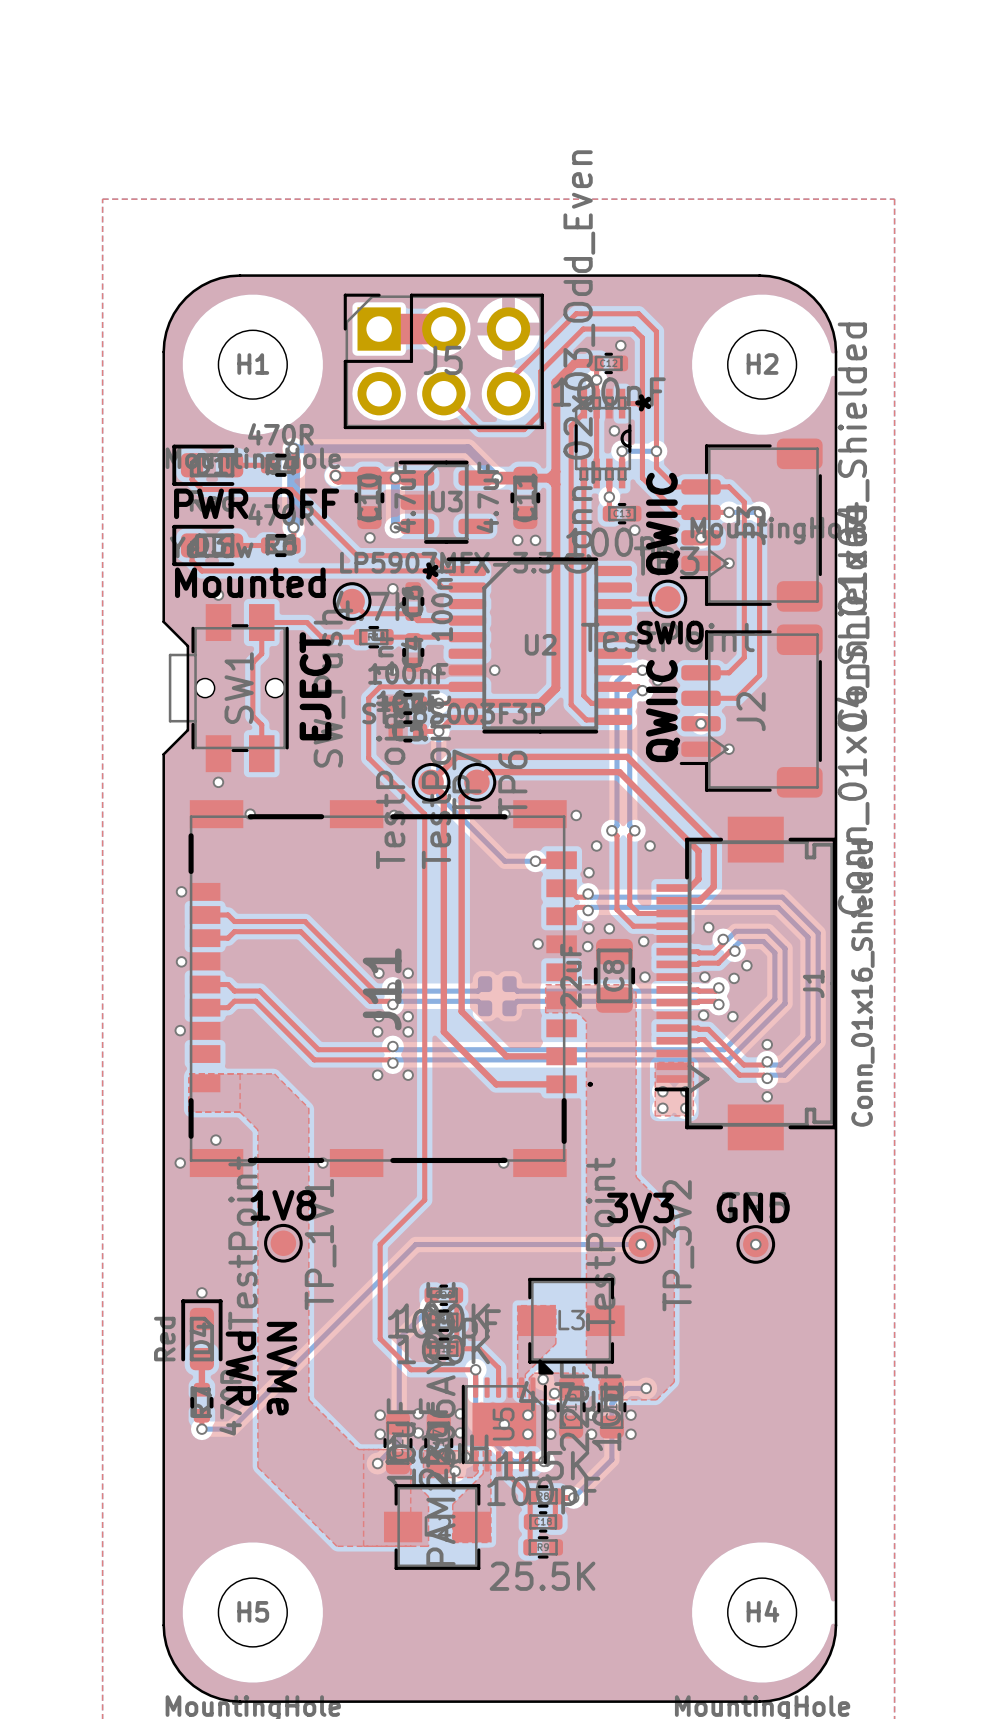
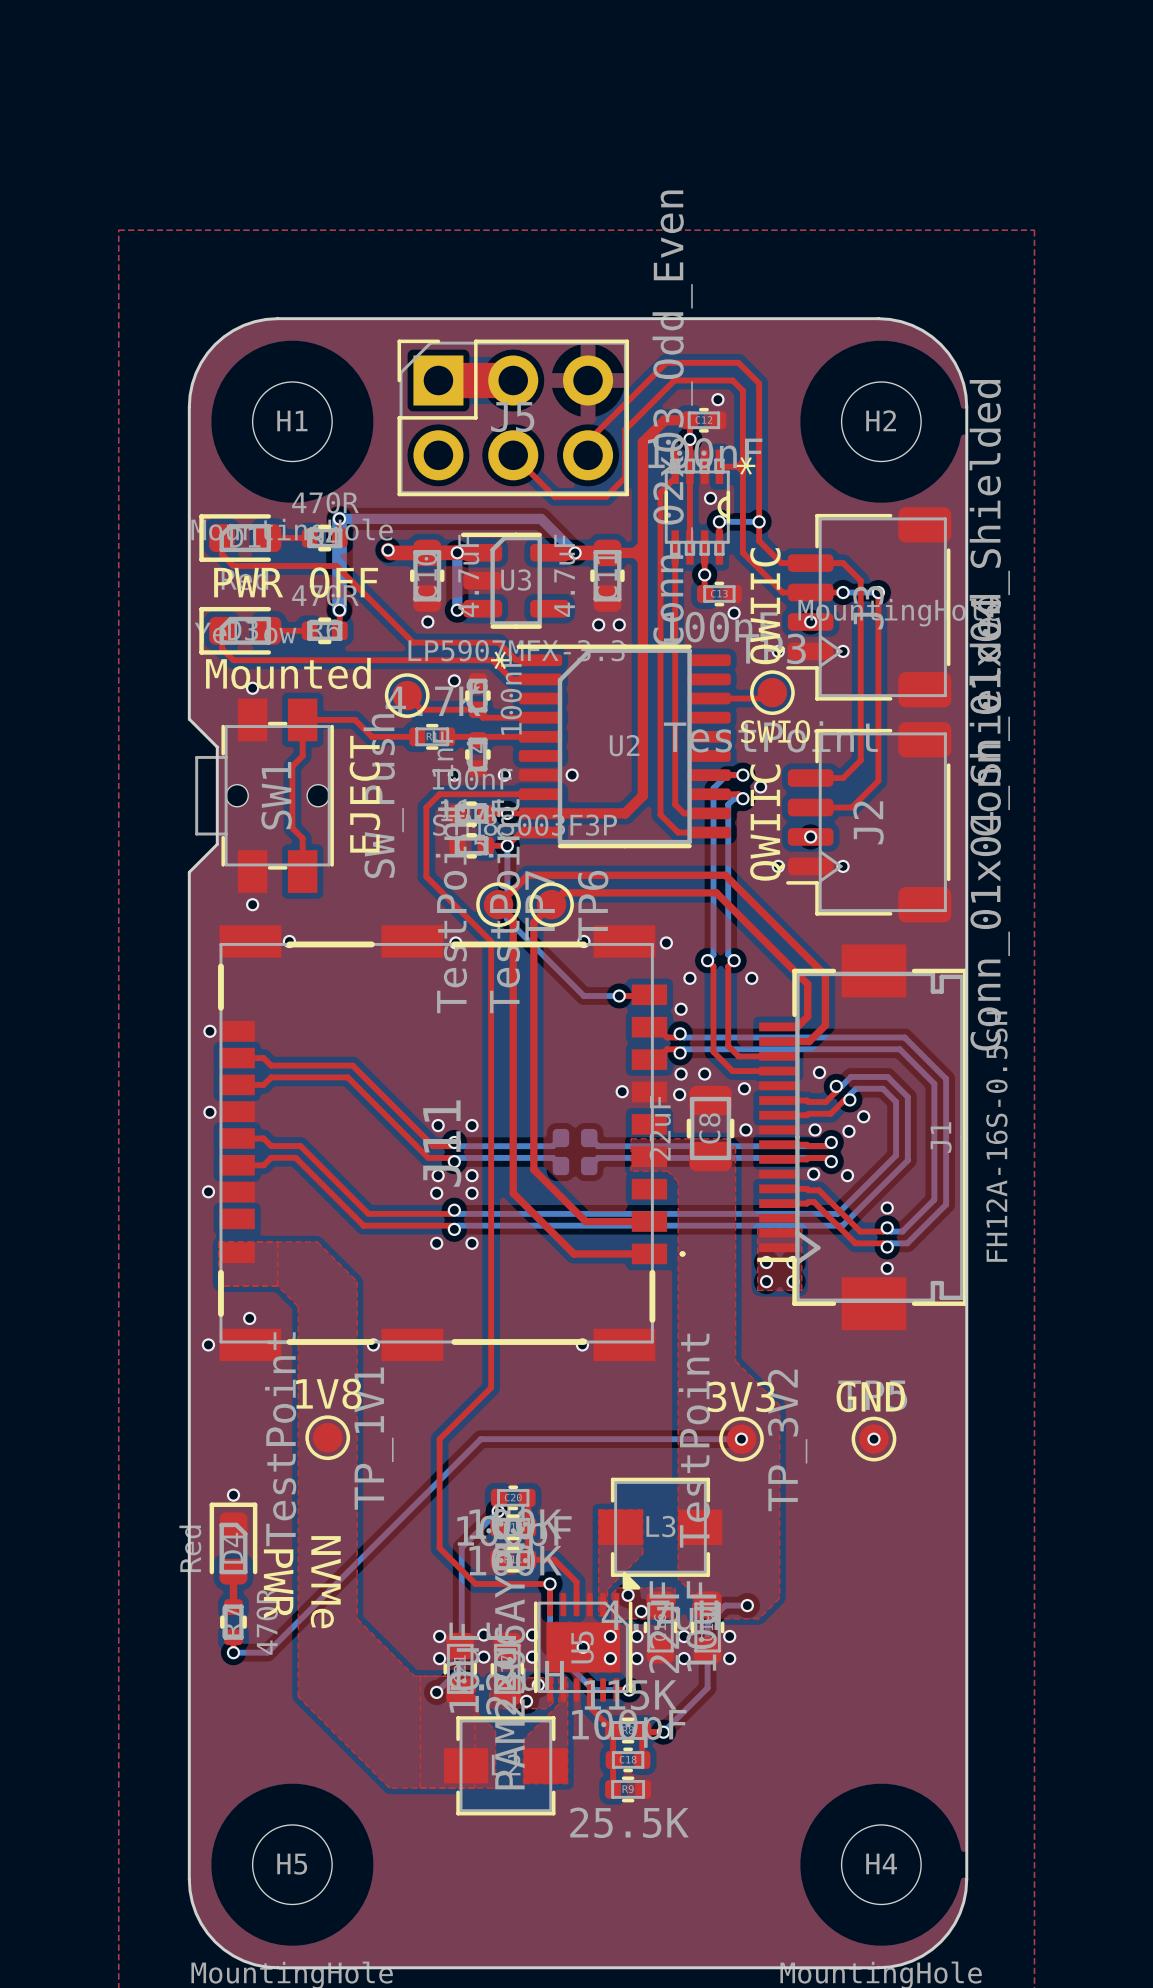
J1 value: Conn_01x16_Shielded (862, 983) -> FH12A-16S-0.5SH (996, 1136)

